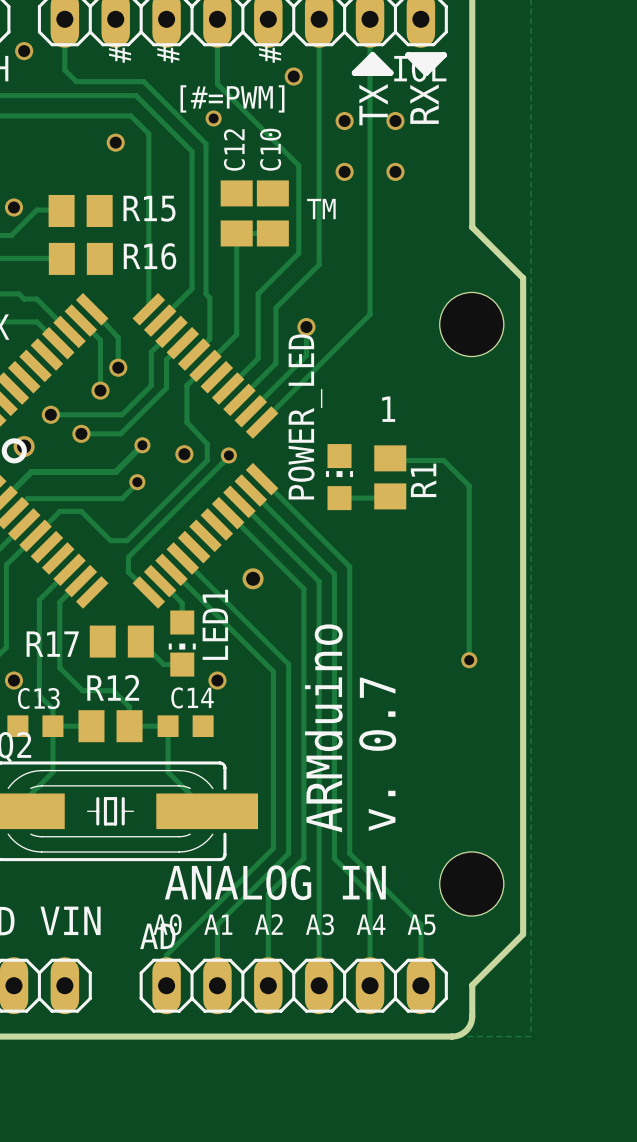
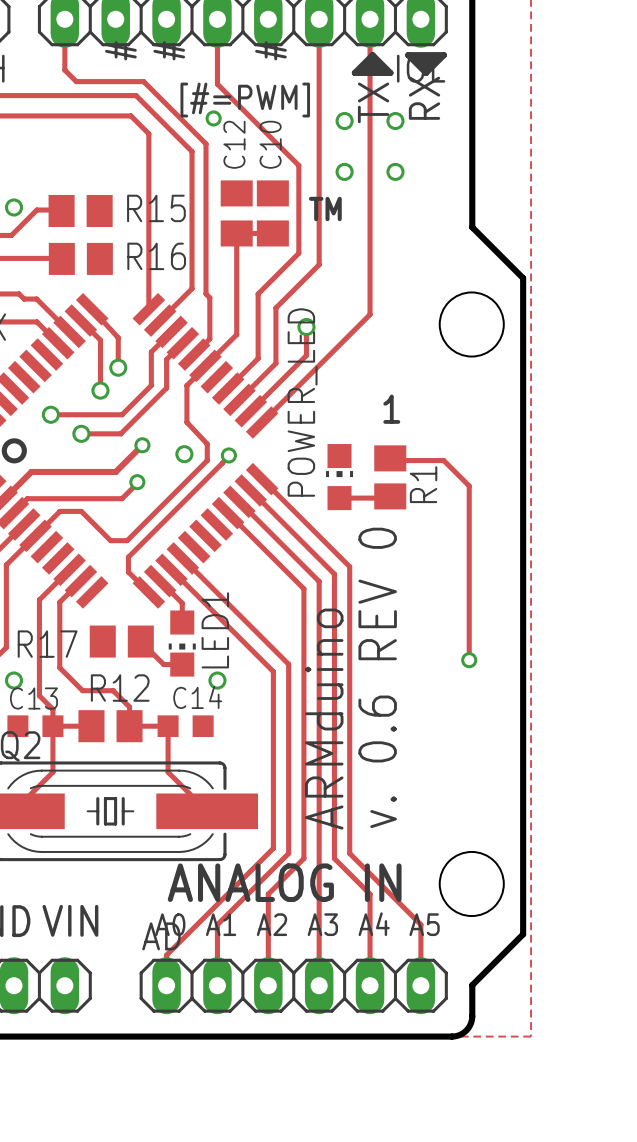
via: (24, 51) -> none
via: (293, 76) -> none
via: (115, 142) -> none
via: (24, 446) -> none
via: (253, 578) -> none
text: v. 0.7 (377, 754) -> v. 0.6 REV 0 (377, 677)

